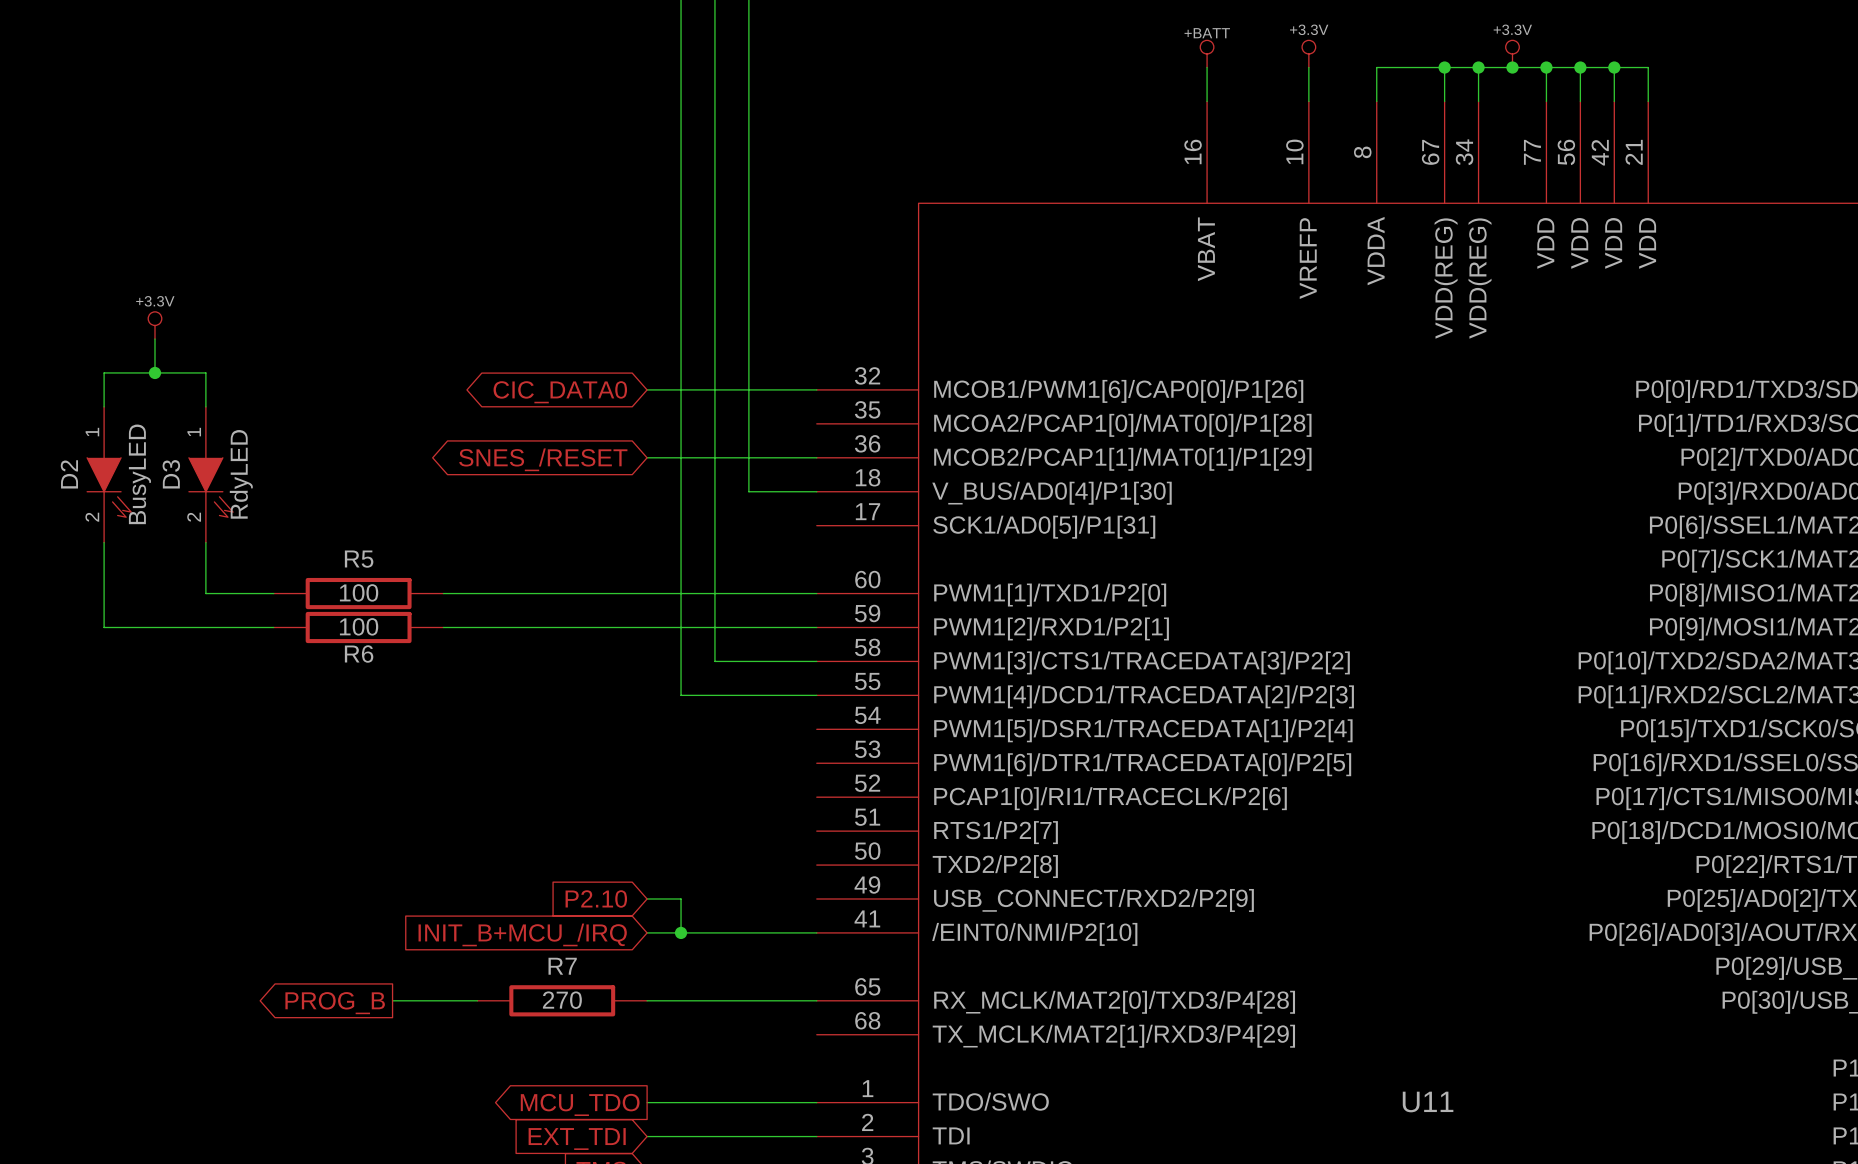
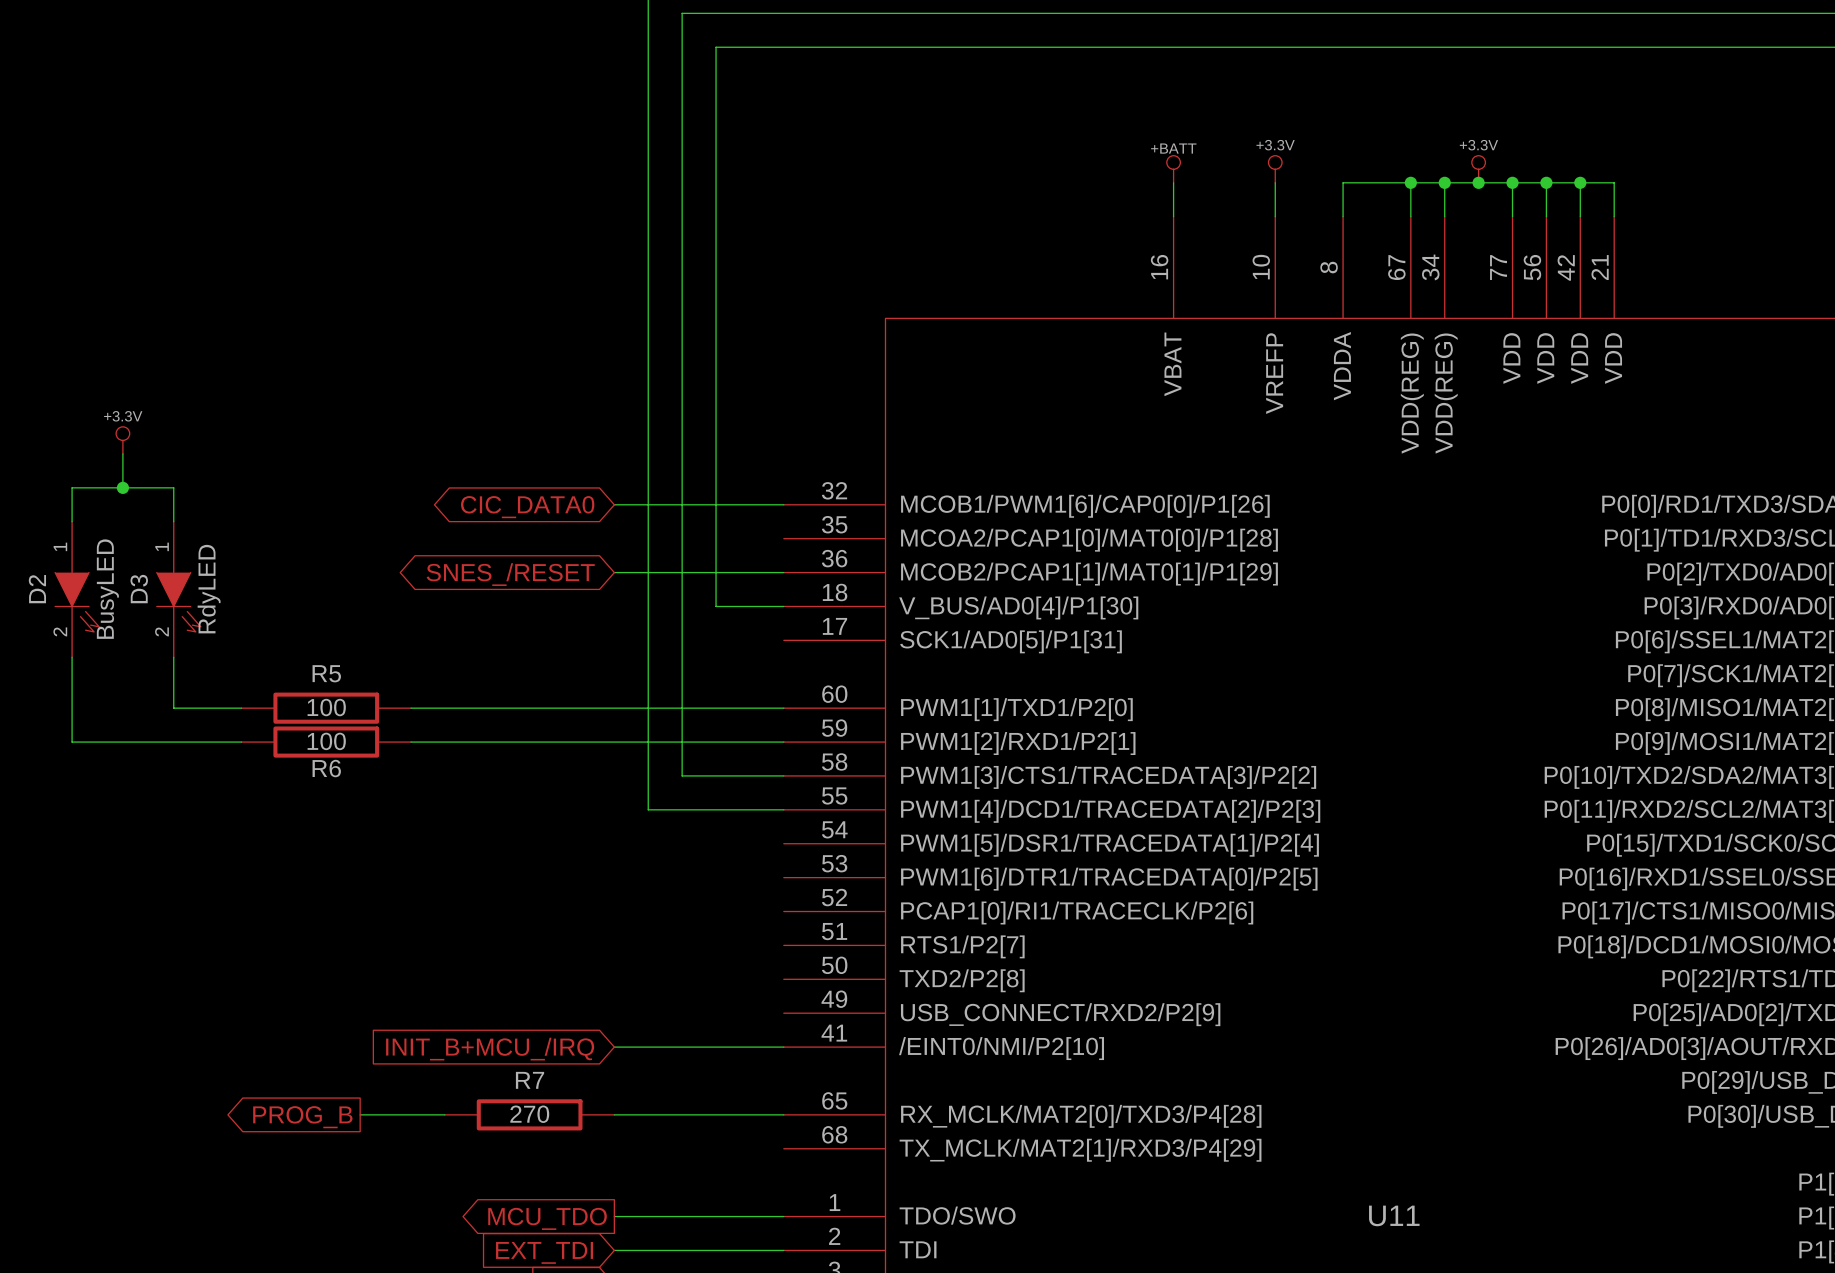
global label: P2.10 (596, 898) -> none
wire: (647, 898) (681, 898) (681, 932) -> none
junction: (681, 932) -> none

